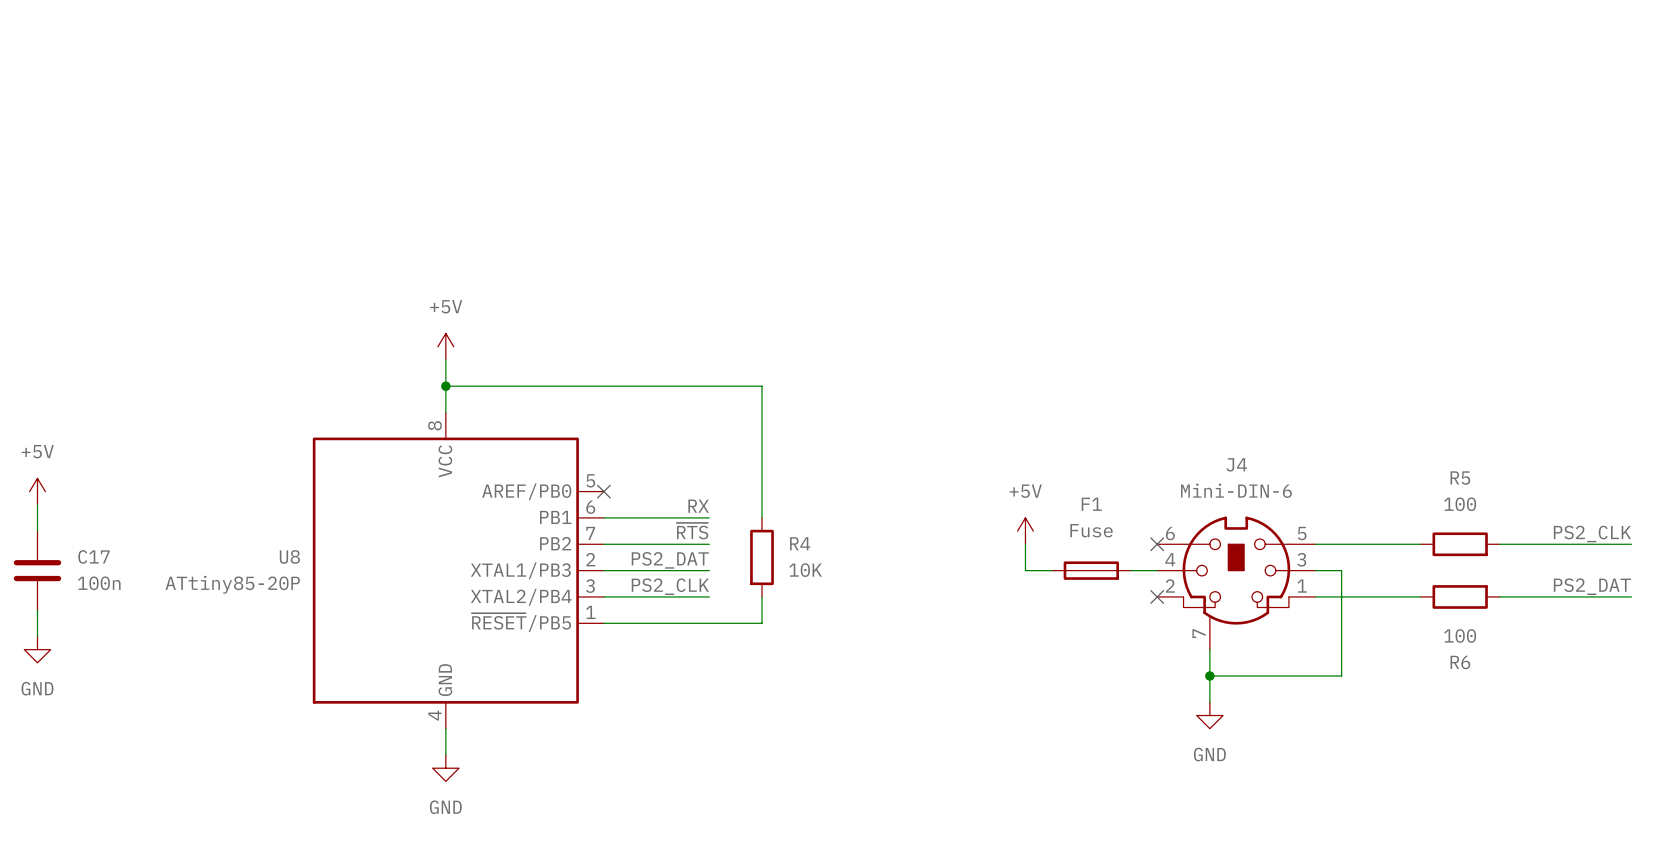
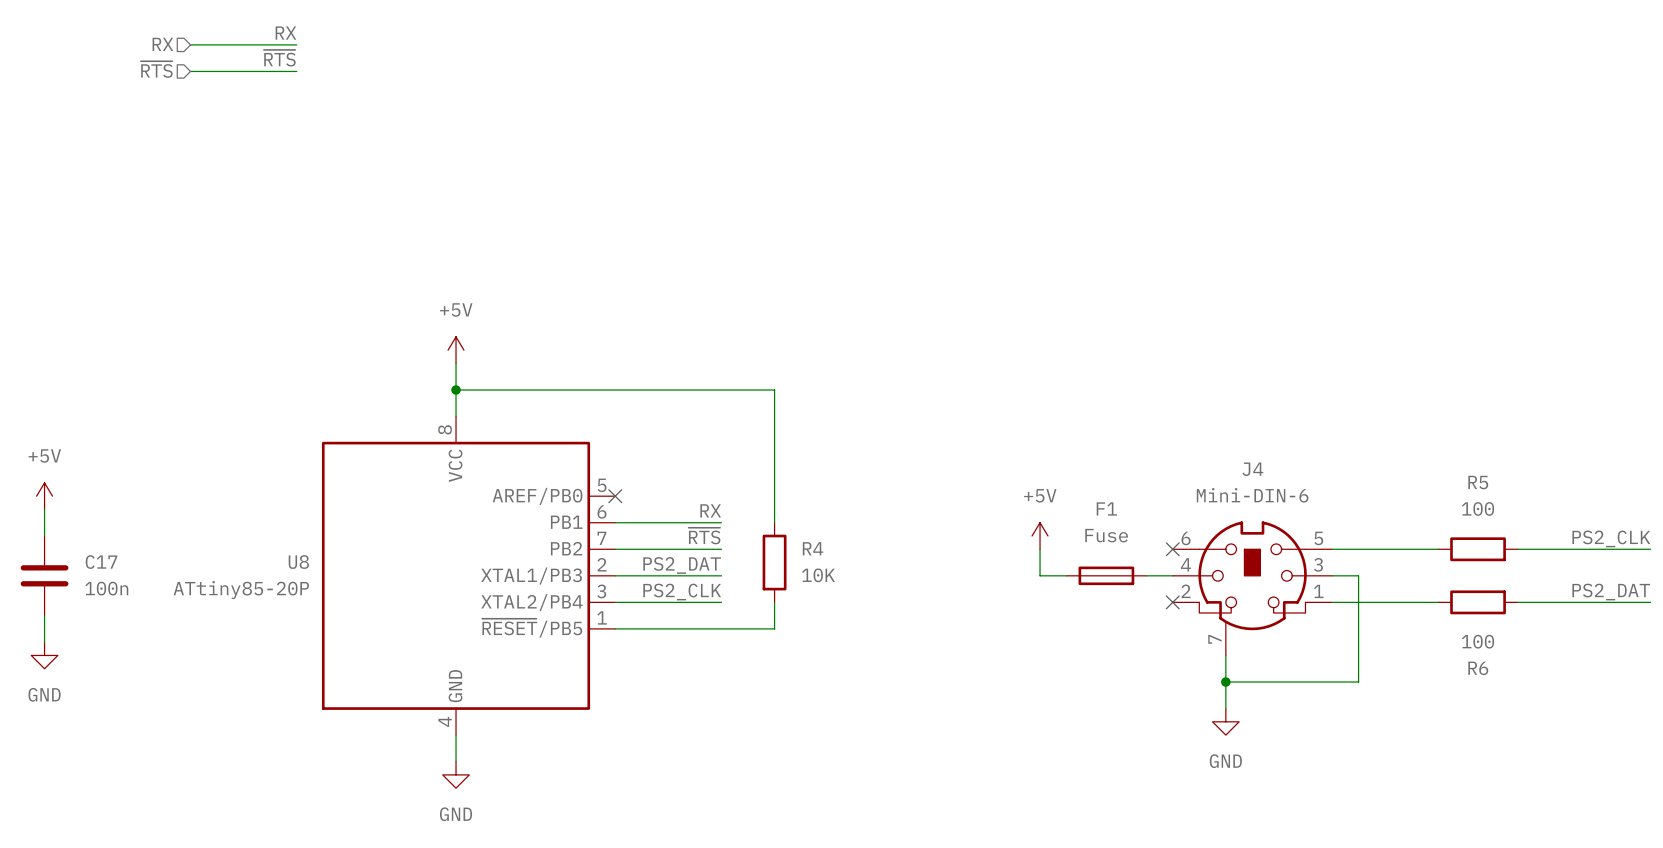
label: none -> RX (285, 33)
hierarchical label: none -> RX (162, 44)
wire: none -> (190, 44) (296, 44)
label: none -> ~{RTS} (279, 58)
hierarchical label: none -> ~{RTS} (156, 69)
wire: none -> (190, 71) (296, 71)

